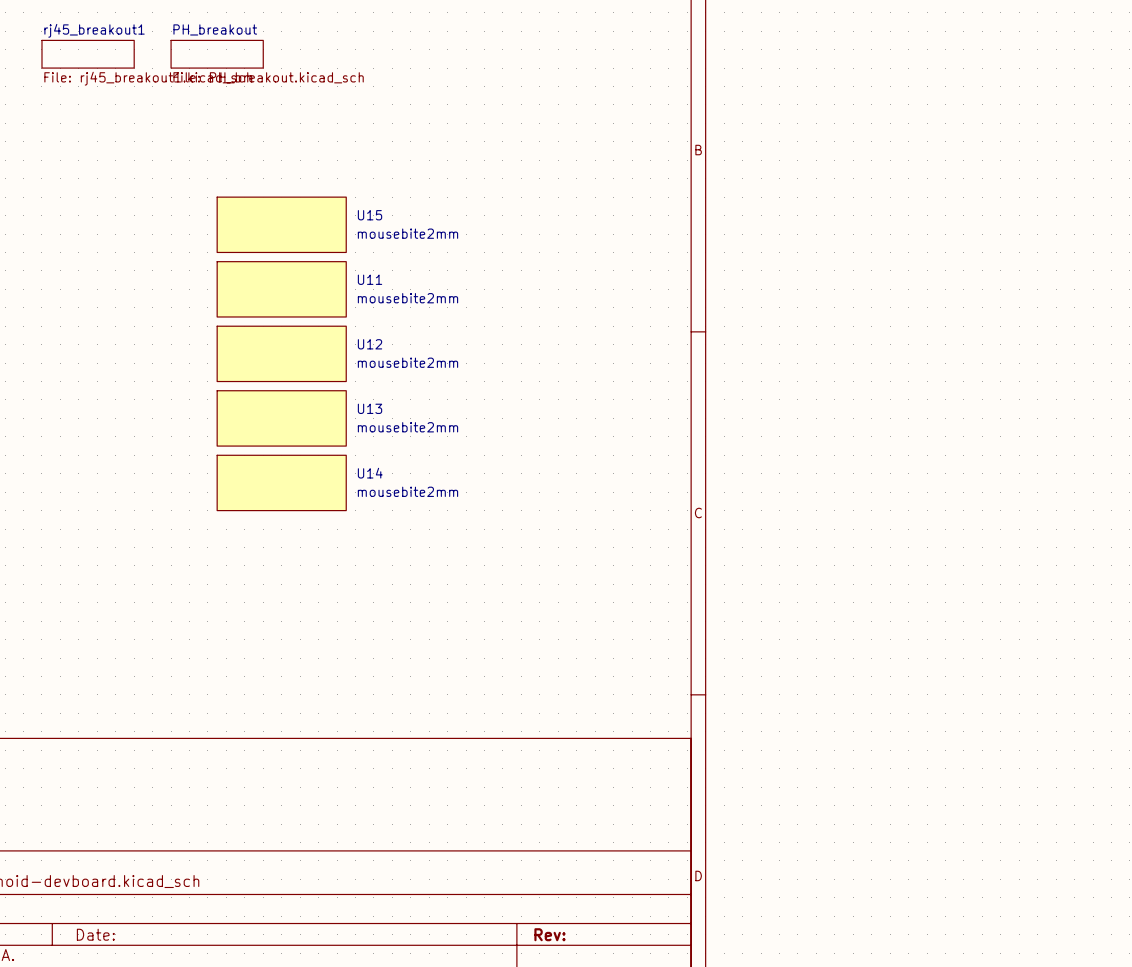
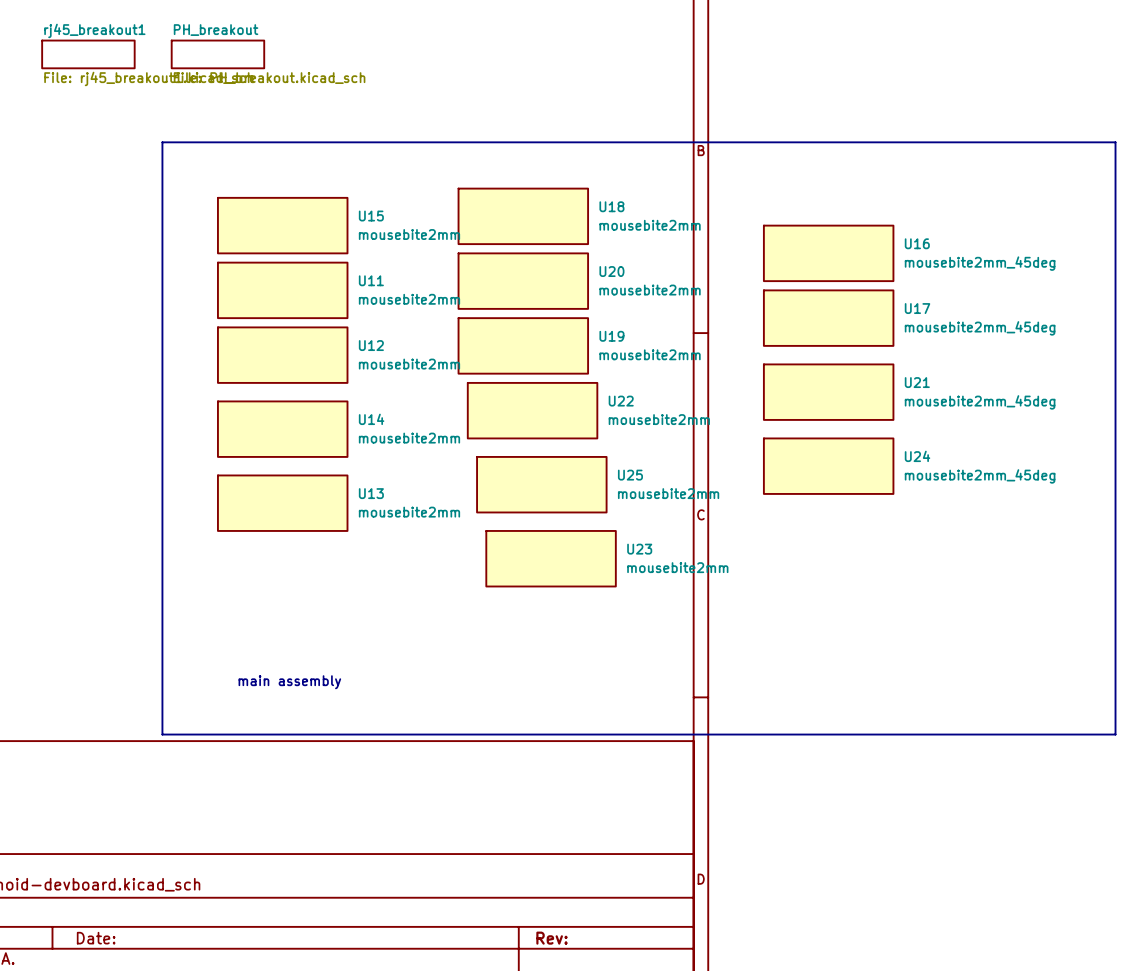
line: none -> (162, 142) (162, 734) (1115, 734) (1115, 142) (162, 142)
U18: none -> mousebite2mm (523, 216)
U16: none -> mousebite2mm_45deg (828, 253)
U20: none -> mousebite2mm (523, 281)
U17: none -> mousebite2mm_45deg (828, 318)
U19: none -> mousebite2mm (523, 345)
U21: none -> mousebite2mm_45deg (828, 392)
U22: none -> mousebite2mm (532, 410)
U13 position: (281, 418) -> (282, 503)
U24: none -> mousebite2mm_45deg (828, 466)
U14 position: (281, 482) -> (282, 429)
U25: none -> mousebite2mm (541, 484)
U23: none -> mousebite2mm (551, 558)
text: none -> main assembly (289, 682)

